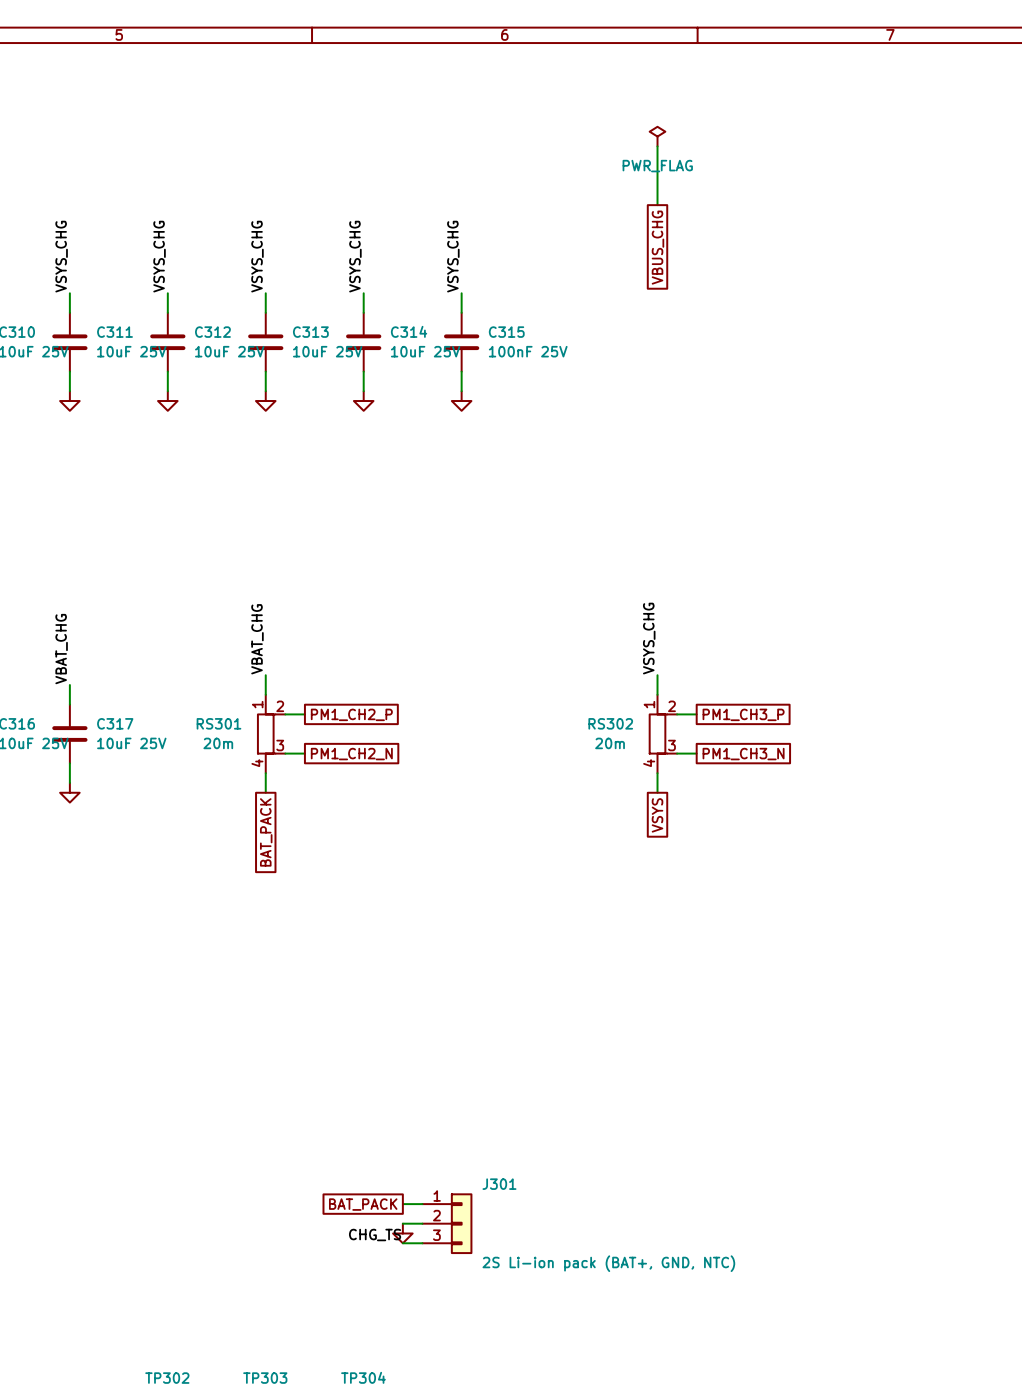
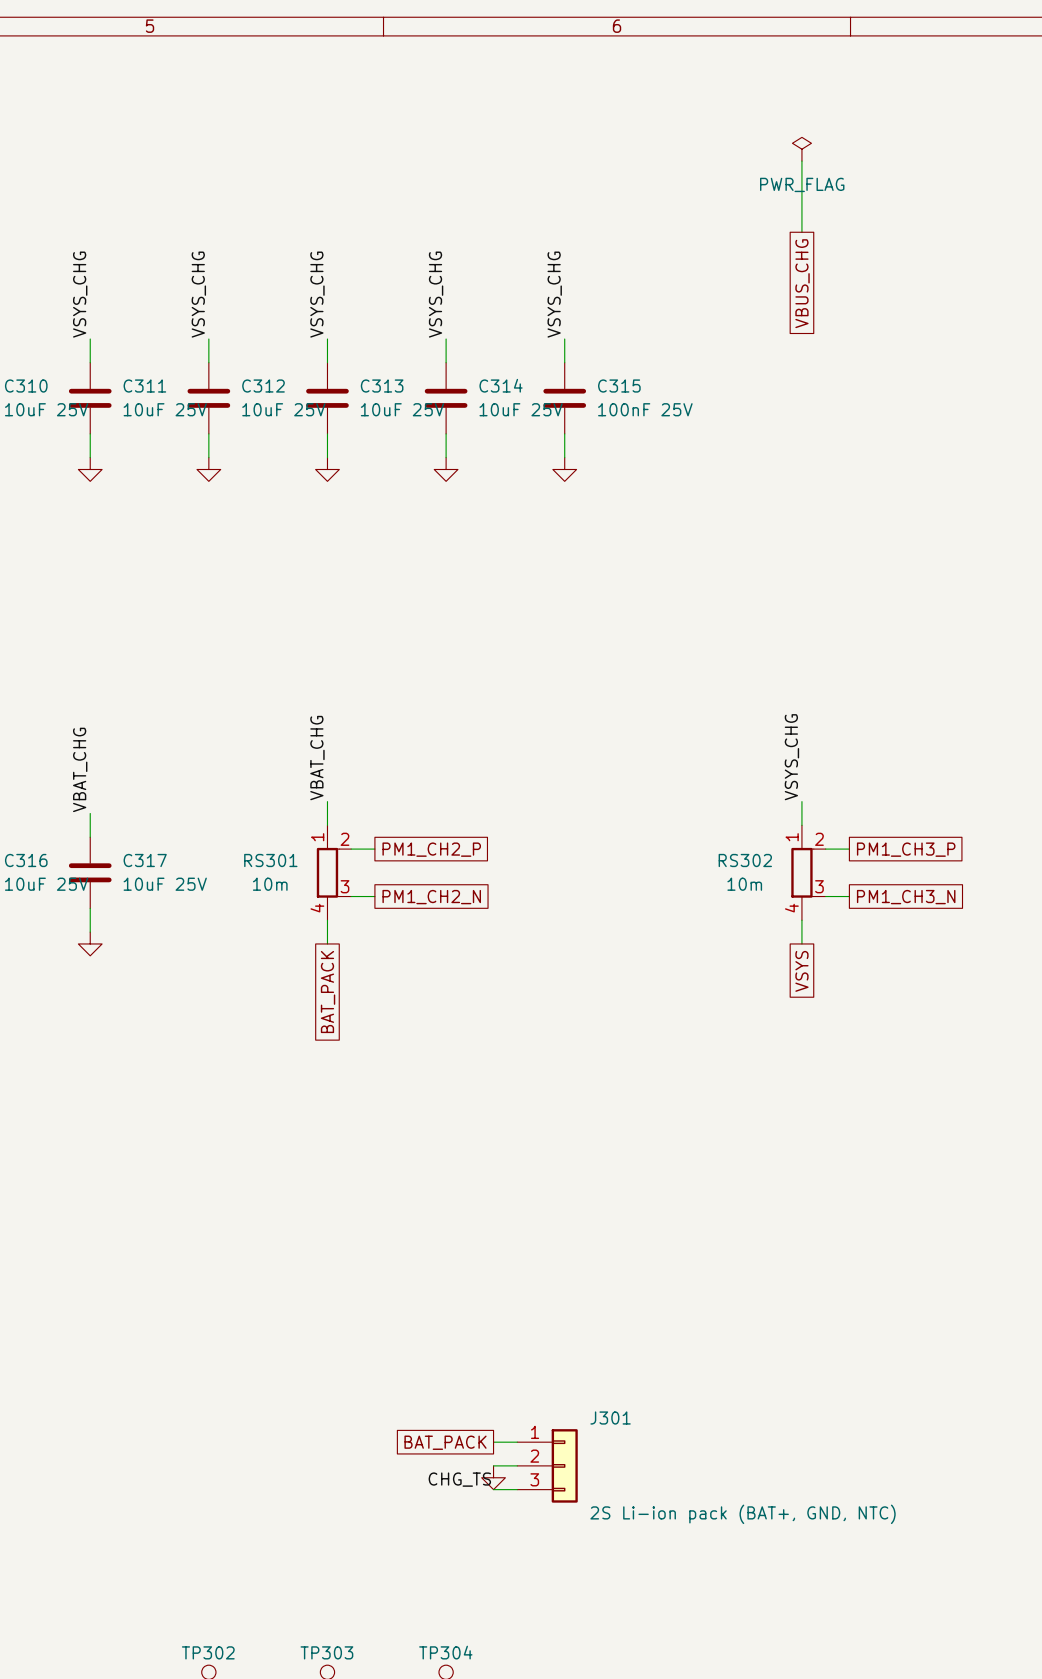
RS301 value: 20m (218, 743) -> 10m (270, 884)
RS302 value: 20m (610, 743) -> 10m (744, 884)

